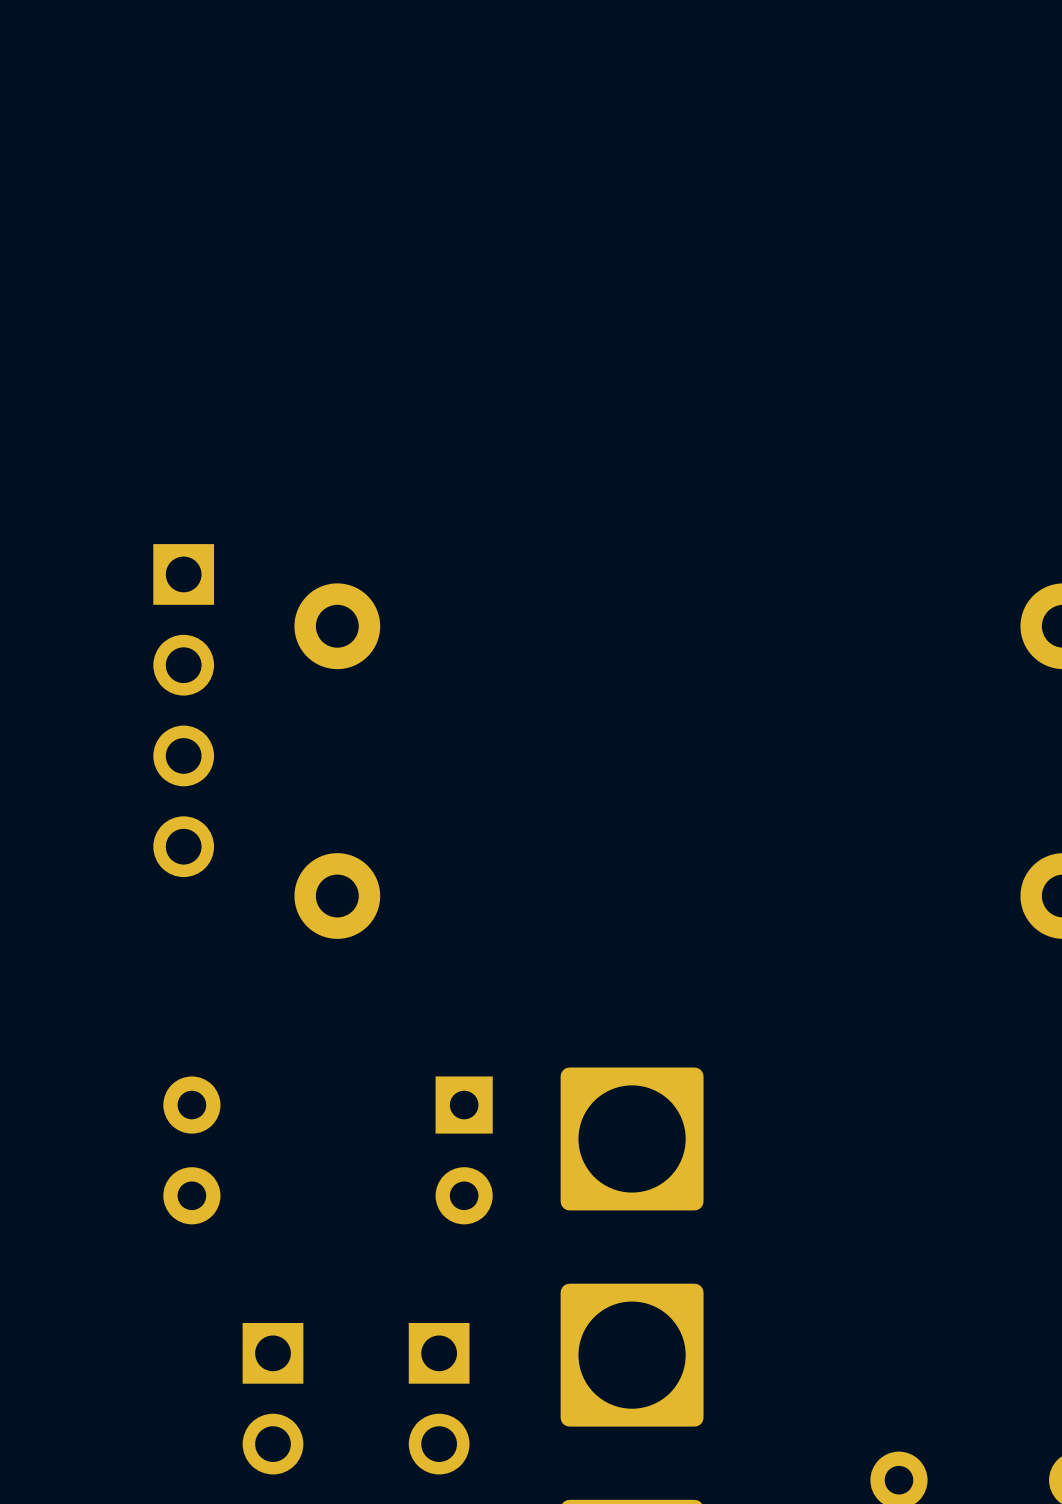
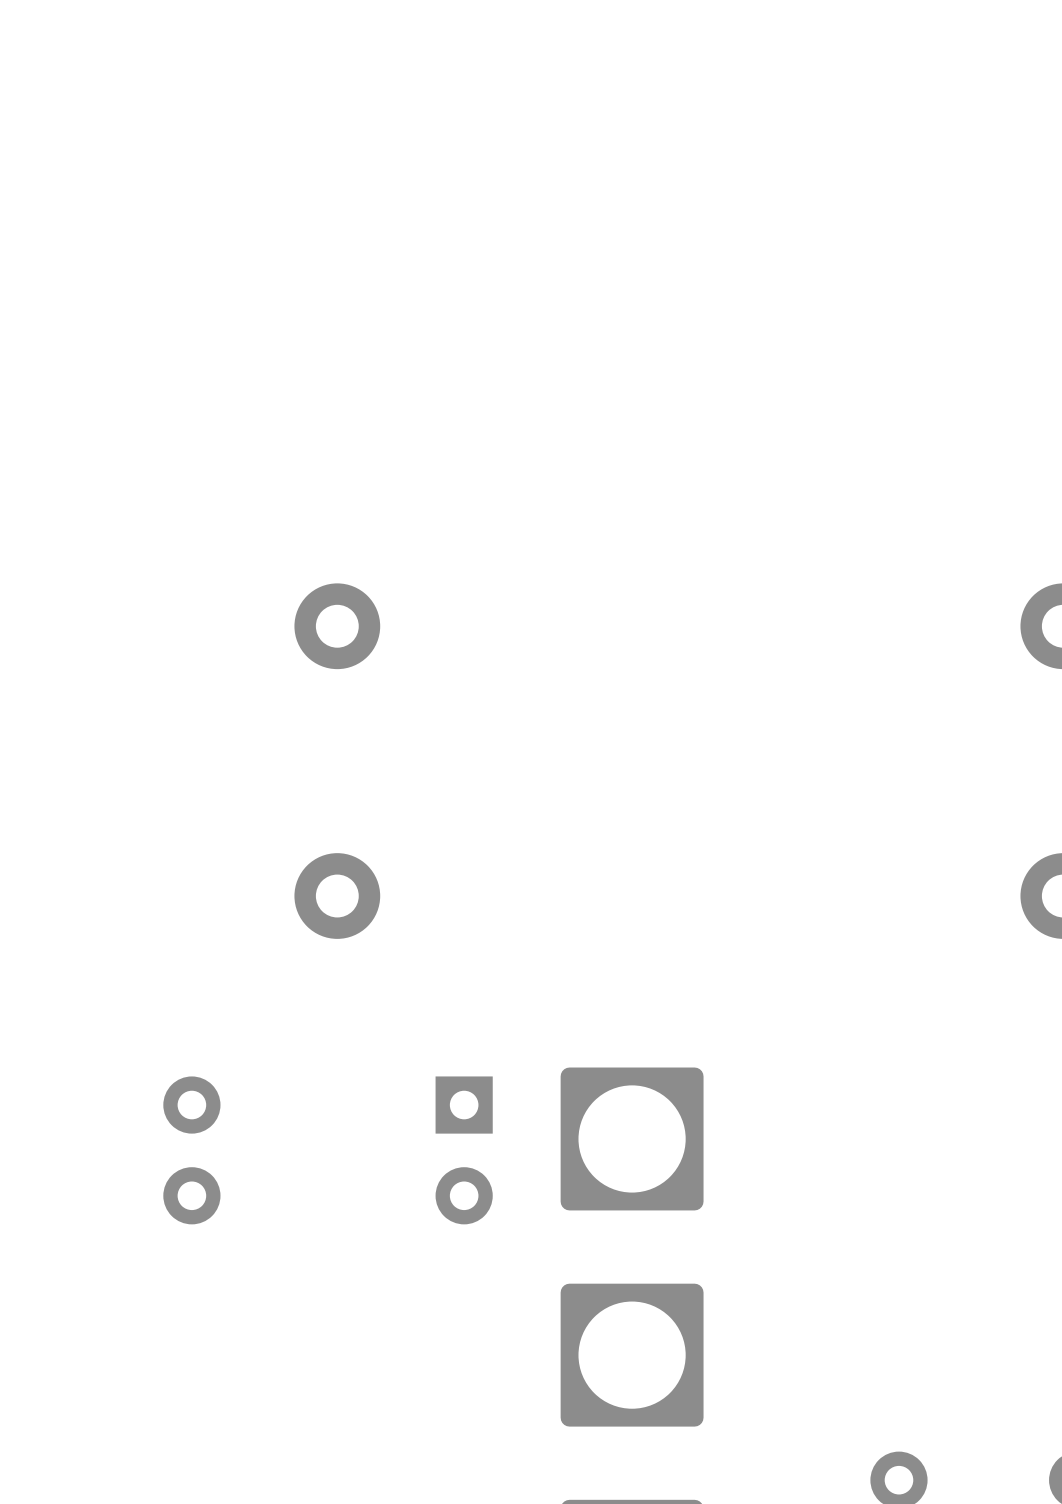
part: (183, 710) -> none
part: (273, 1398) -> none
part: (439, 1398) -> none

